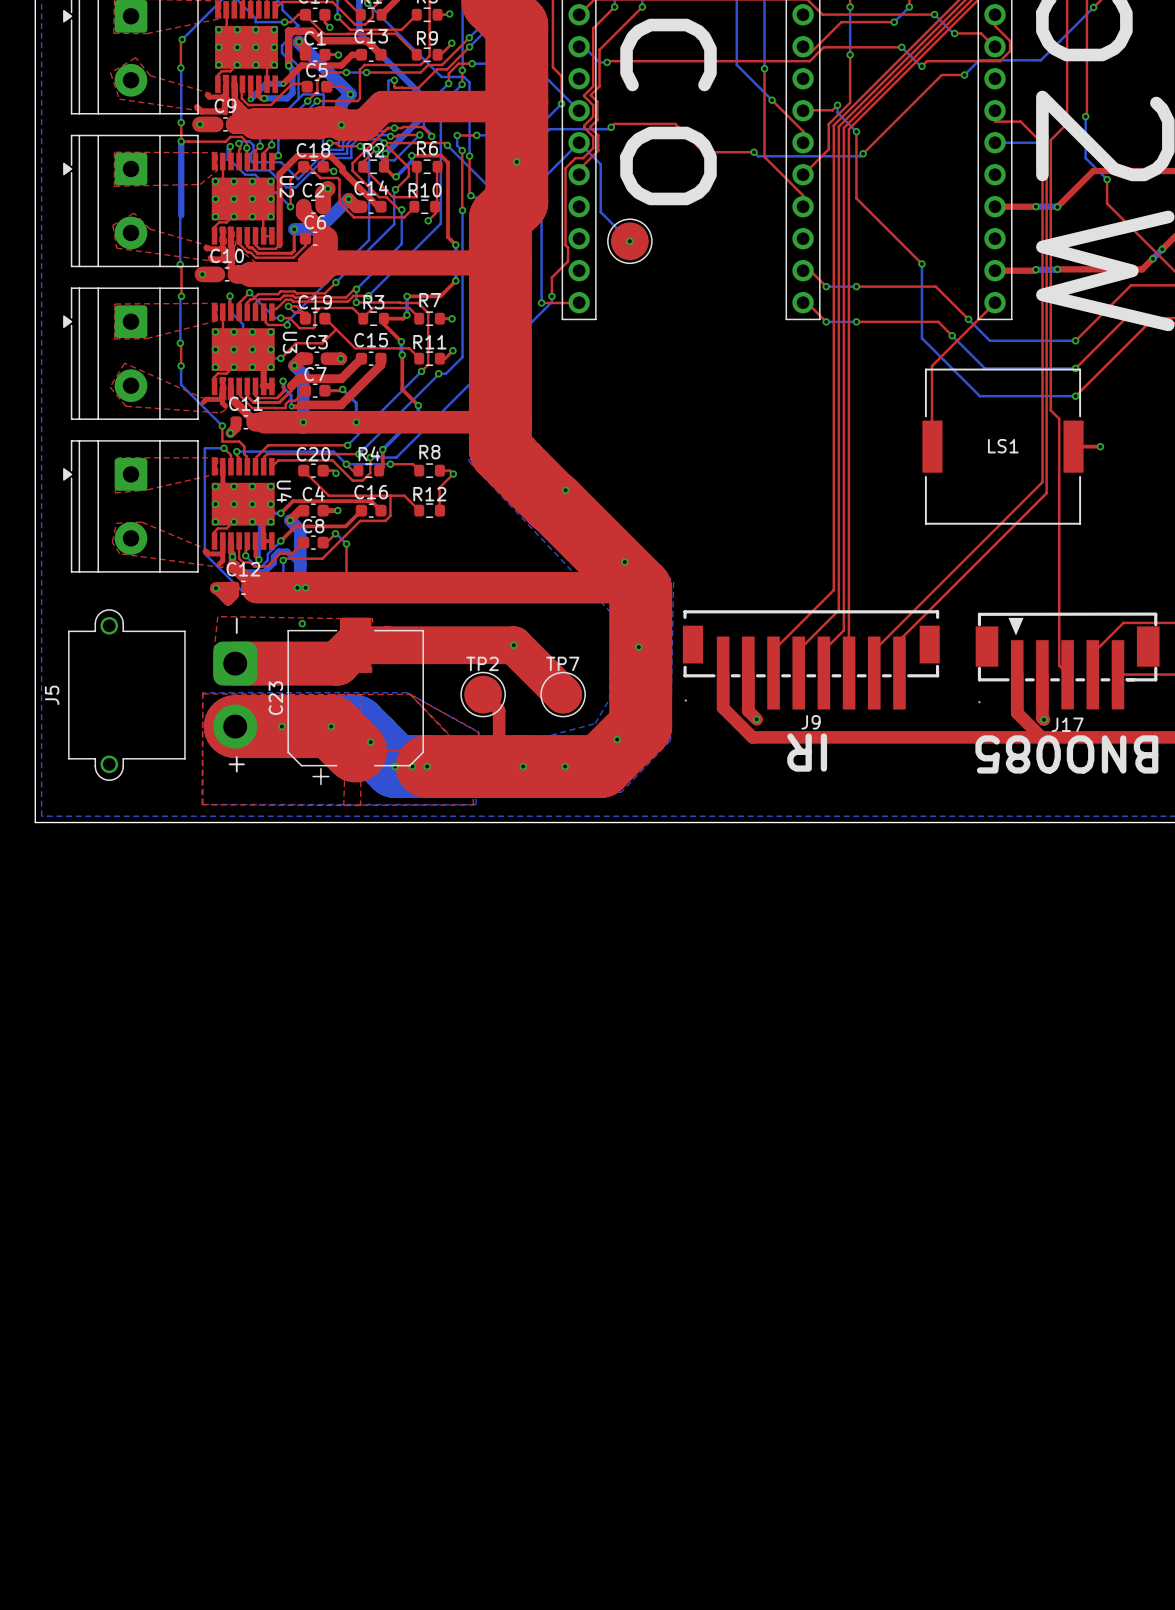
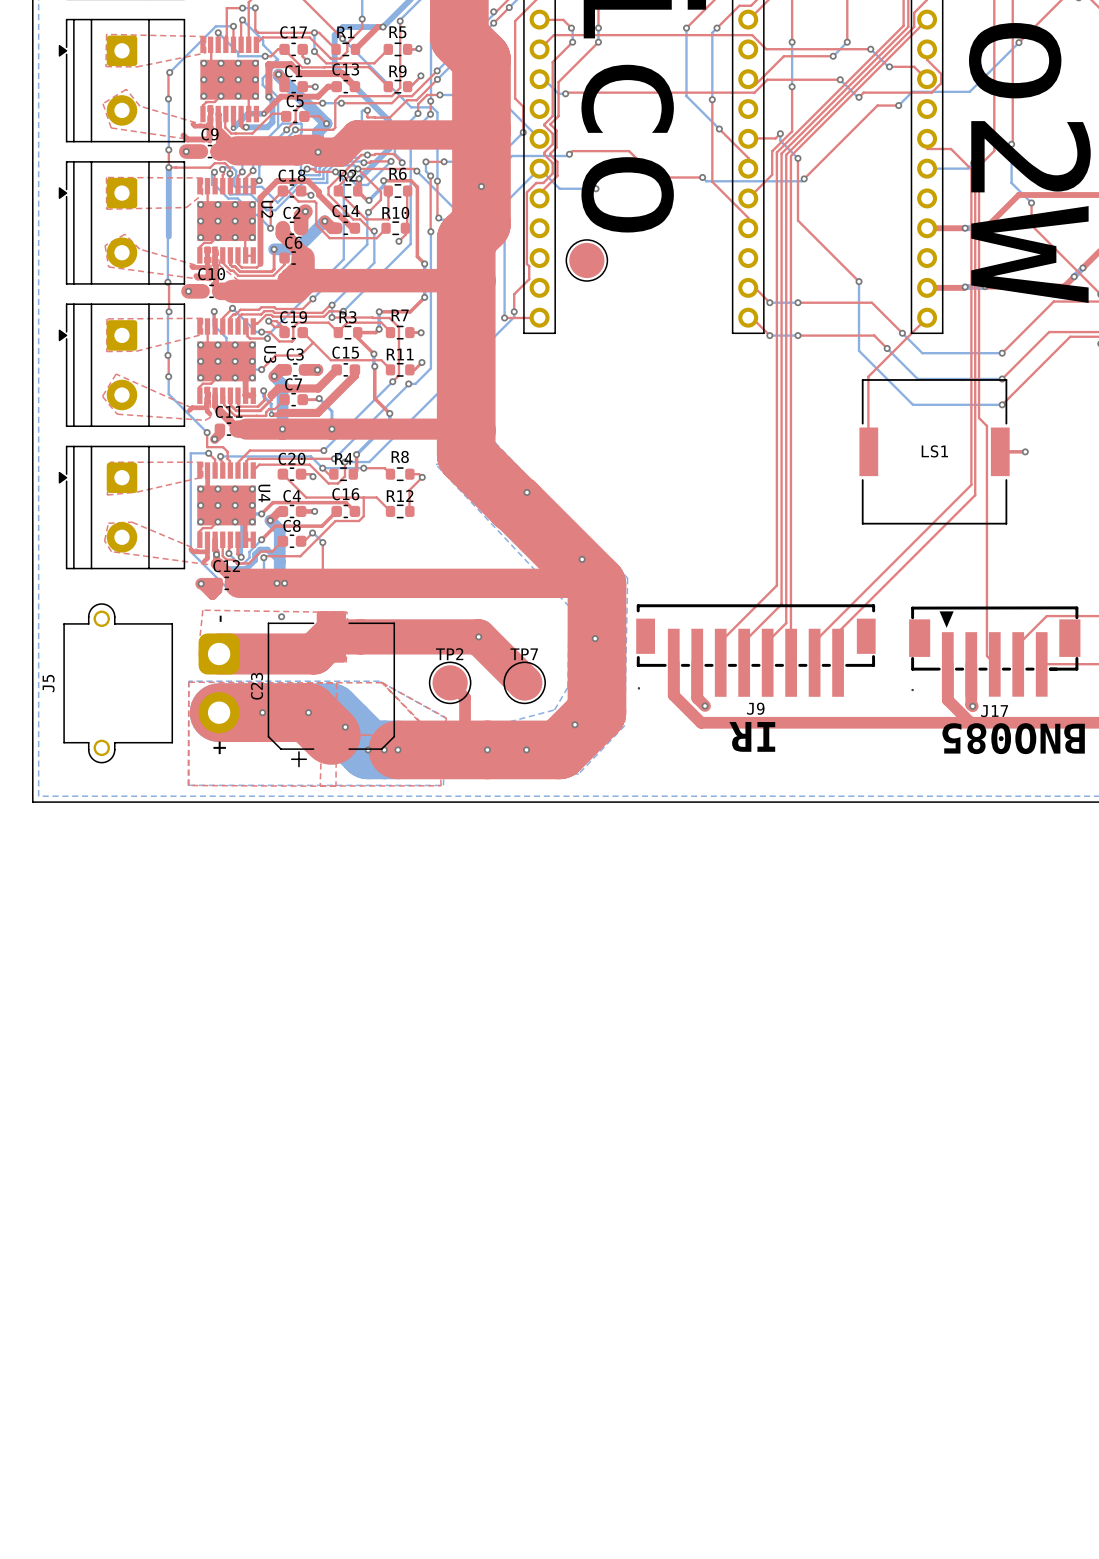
bottom track: (600, 164) (600, 212) (629, 241) -> (559, 188) (596, 188)
via: none -> (596, 188)
via: (629, 241) -> none

